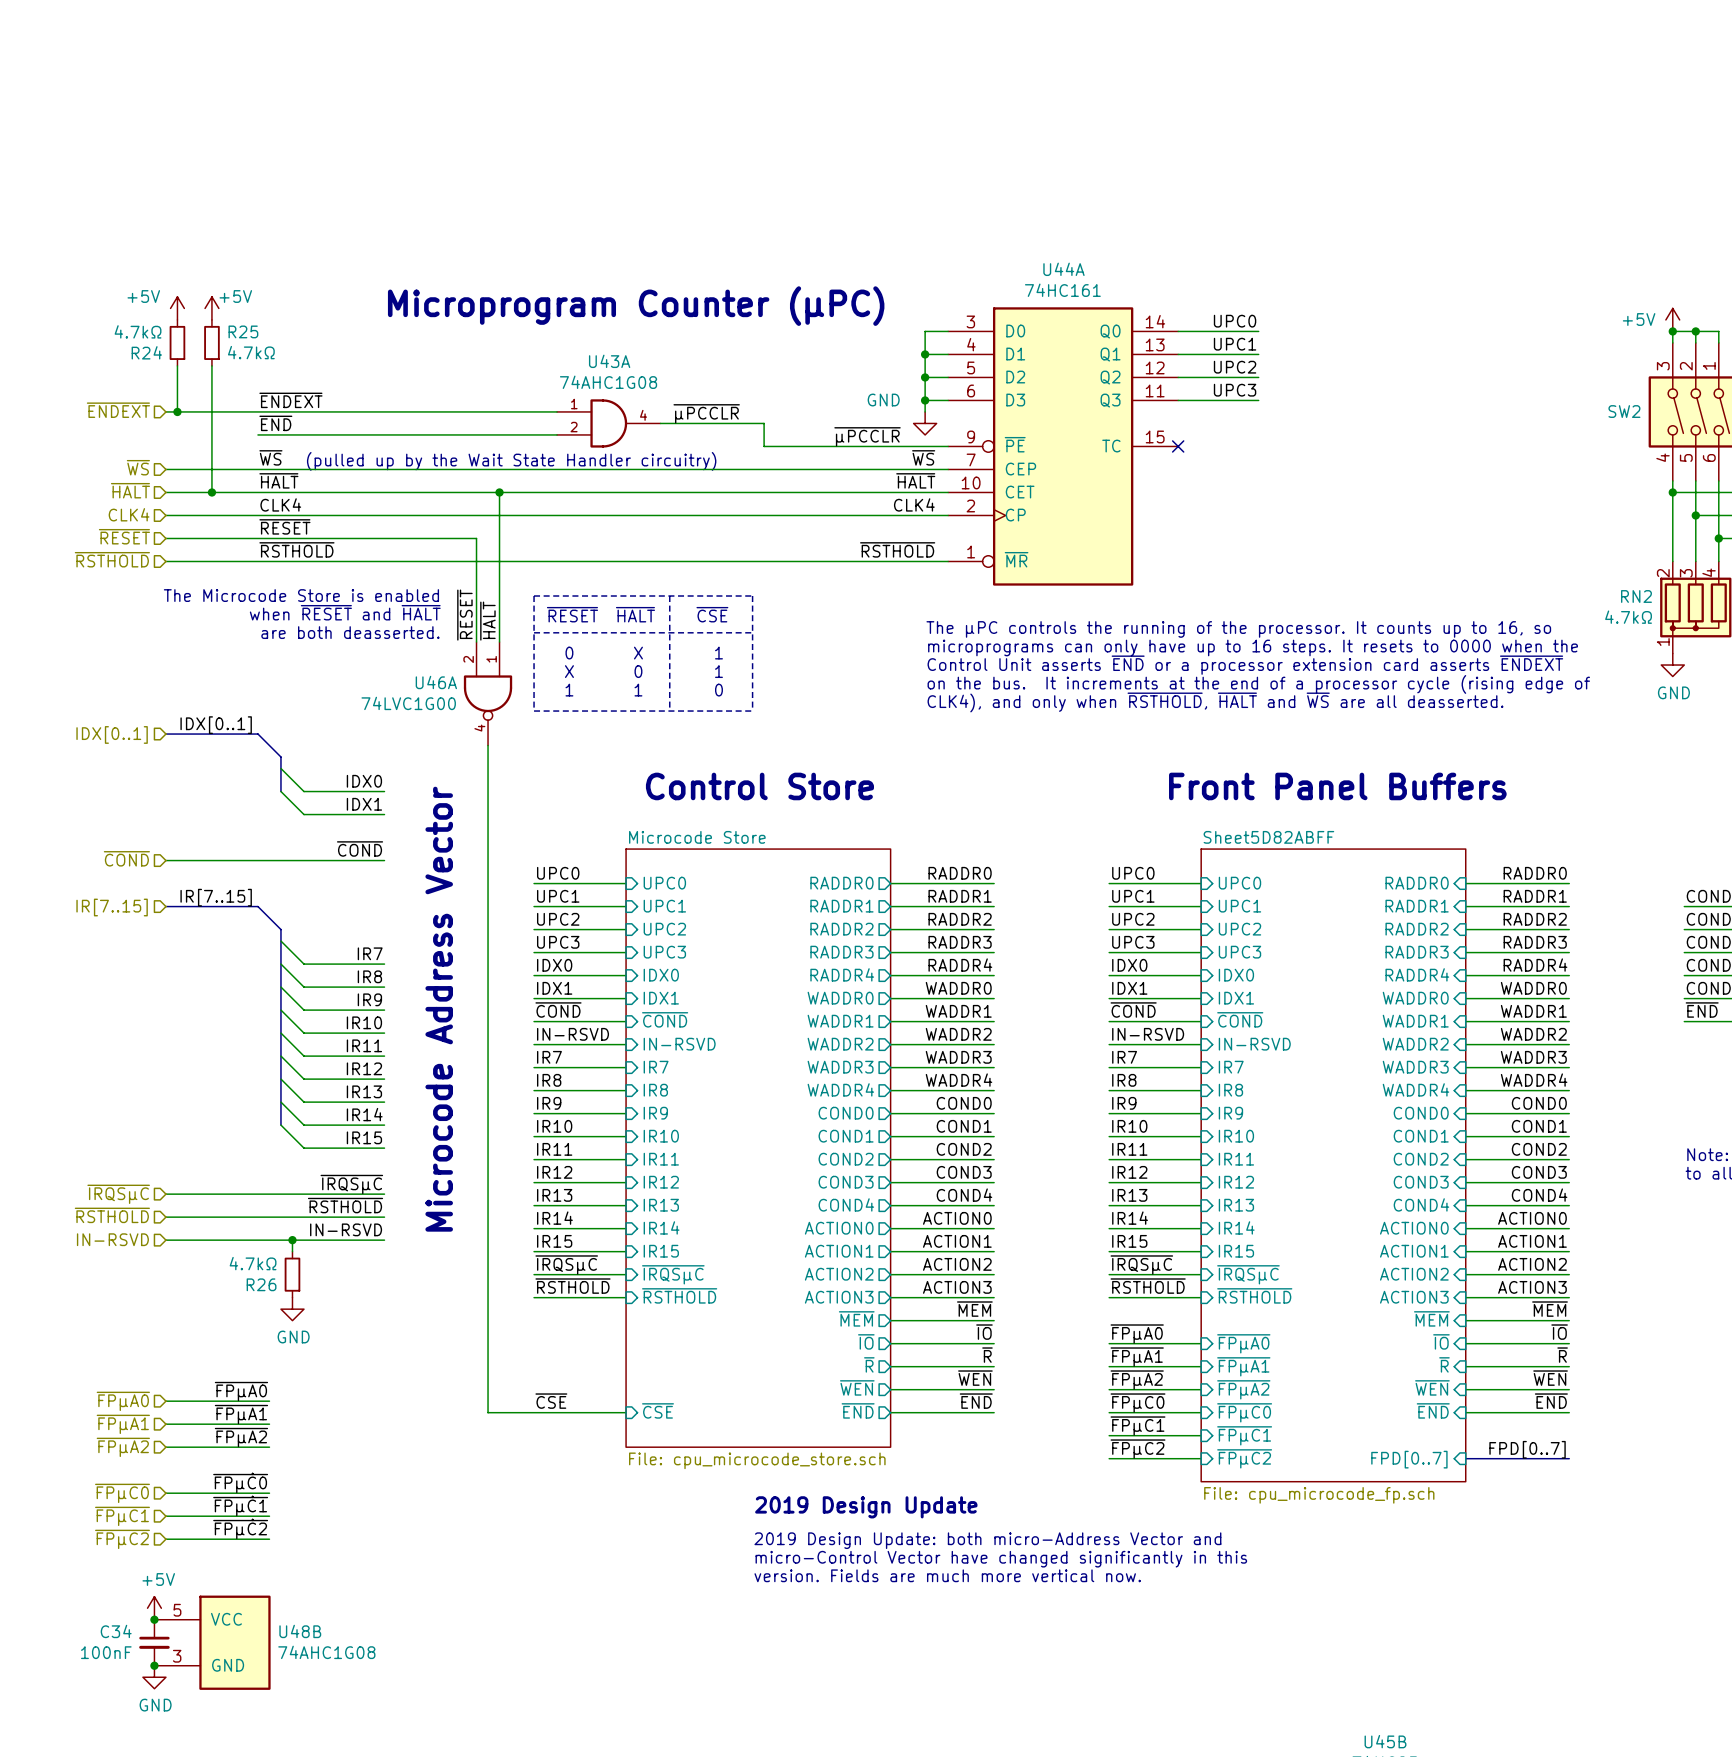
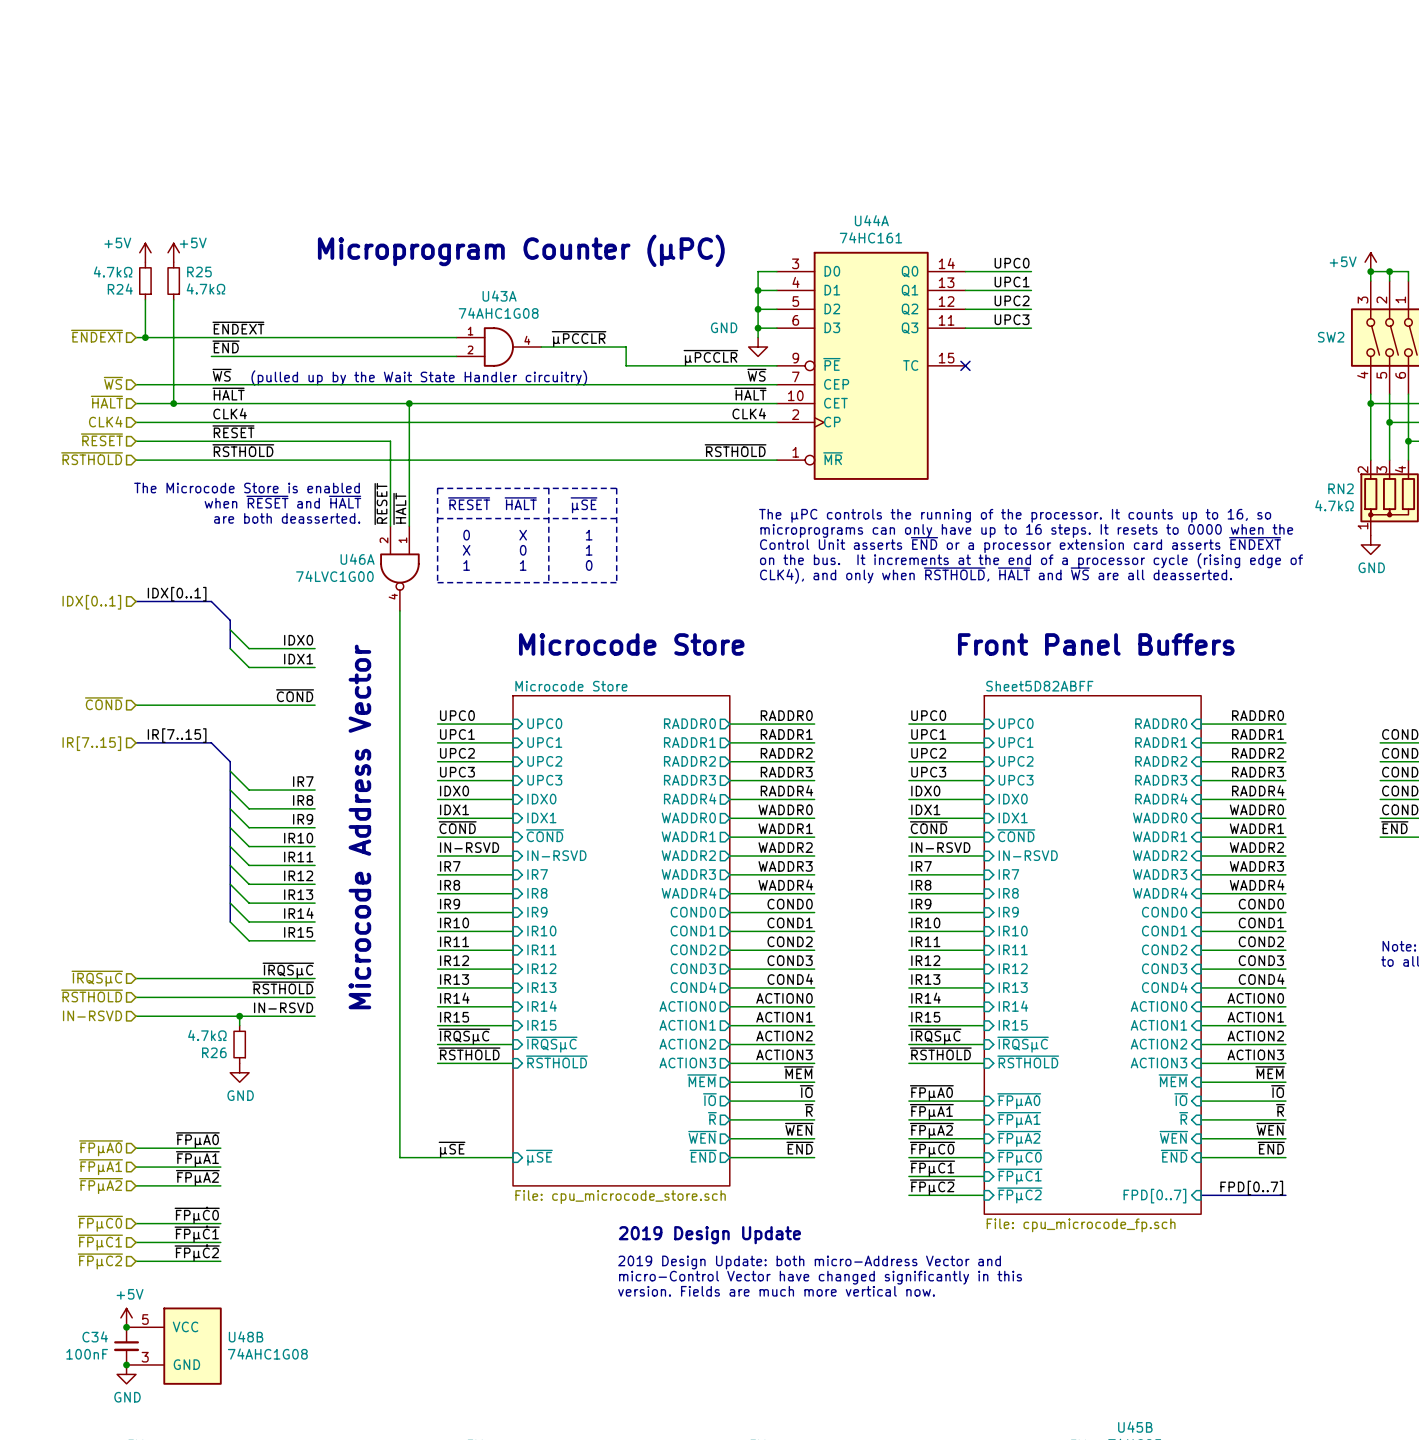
text: ~{CSE} (712, 614) -> ~{µSE} (584, 505)
text: Control Store (759, 786) -> none
text: none -> Microcode Store (631, 644)
label: ~{CSE} (551, 1401) -> ~{µSE} (452, 1149)
sheet pin: ~{CSE} (658, 1410) -> ~{µSE} (539, 1157)

